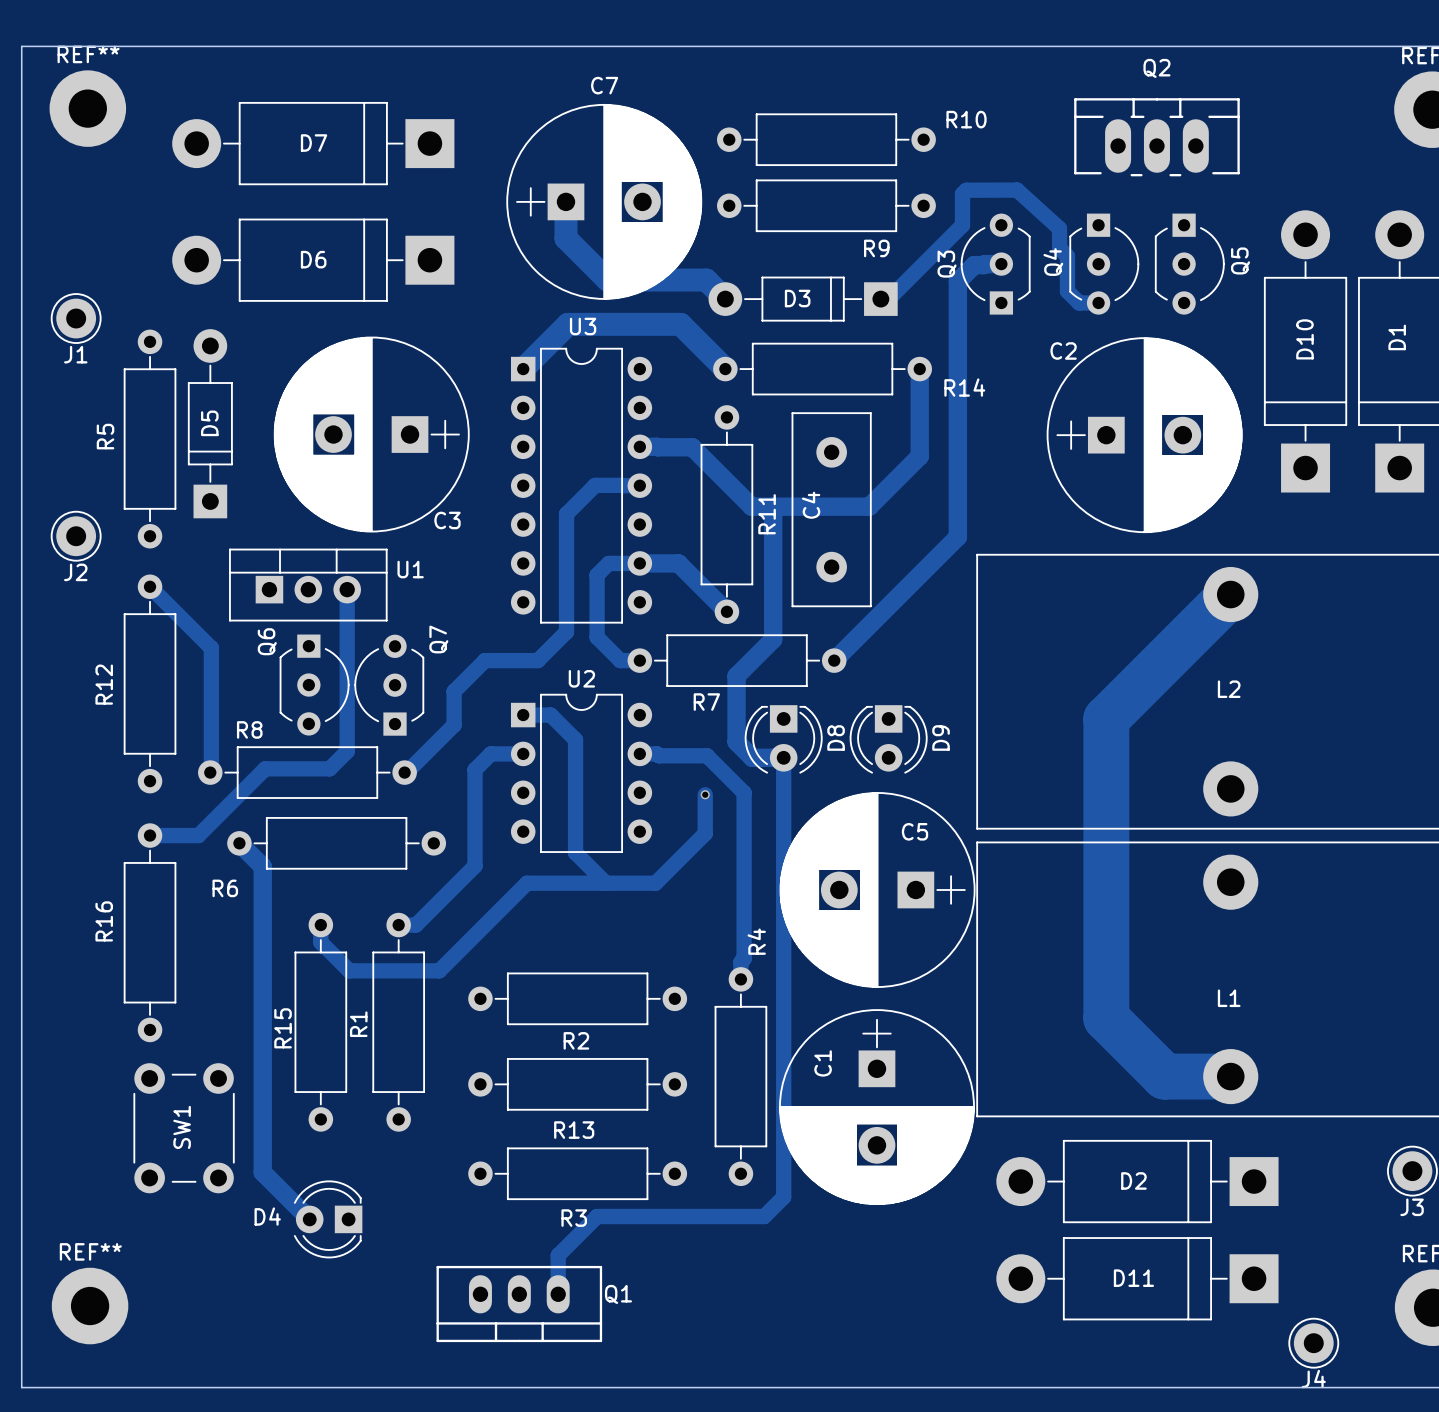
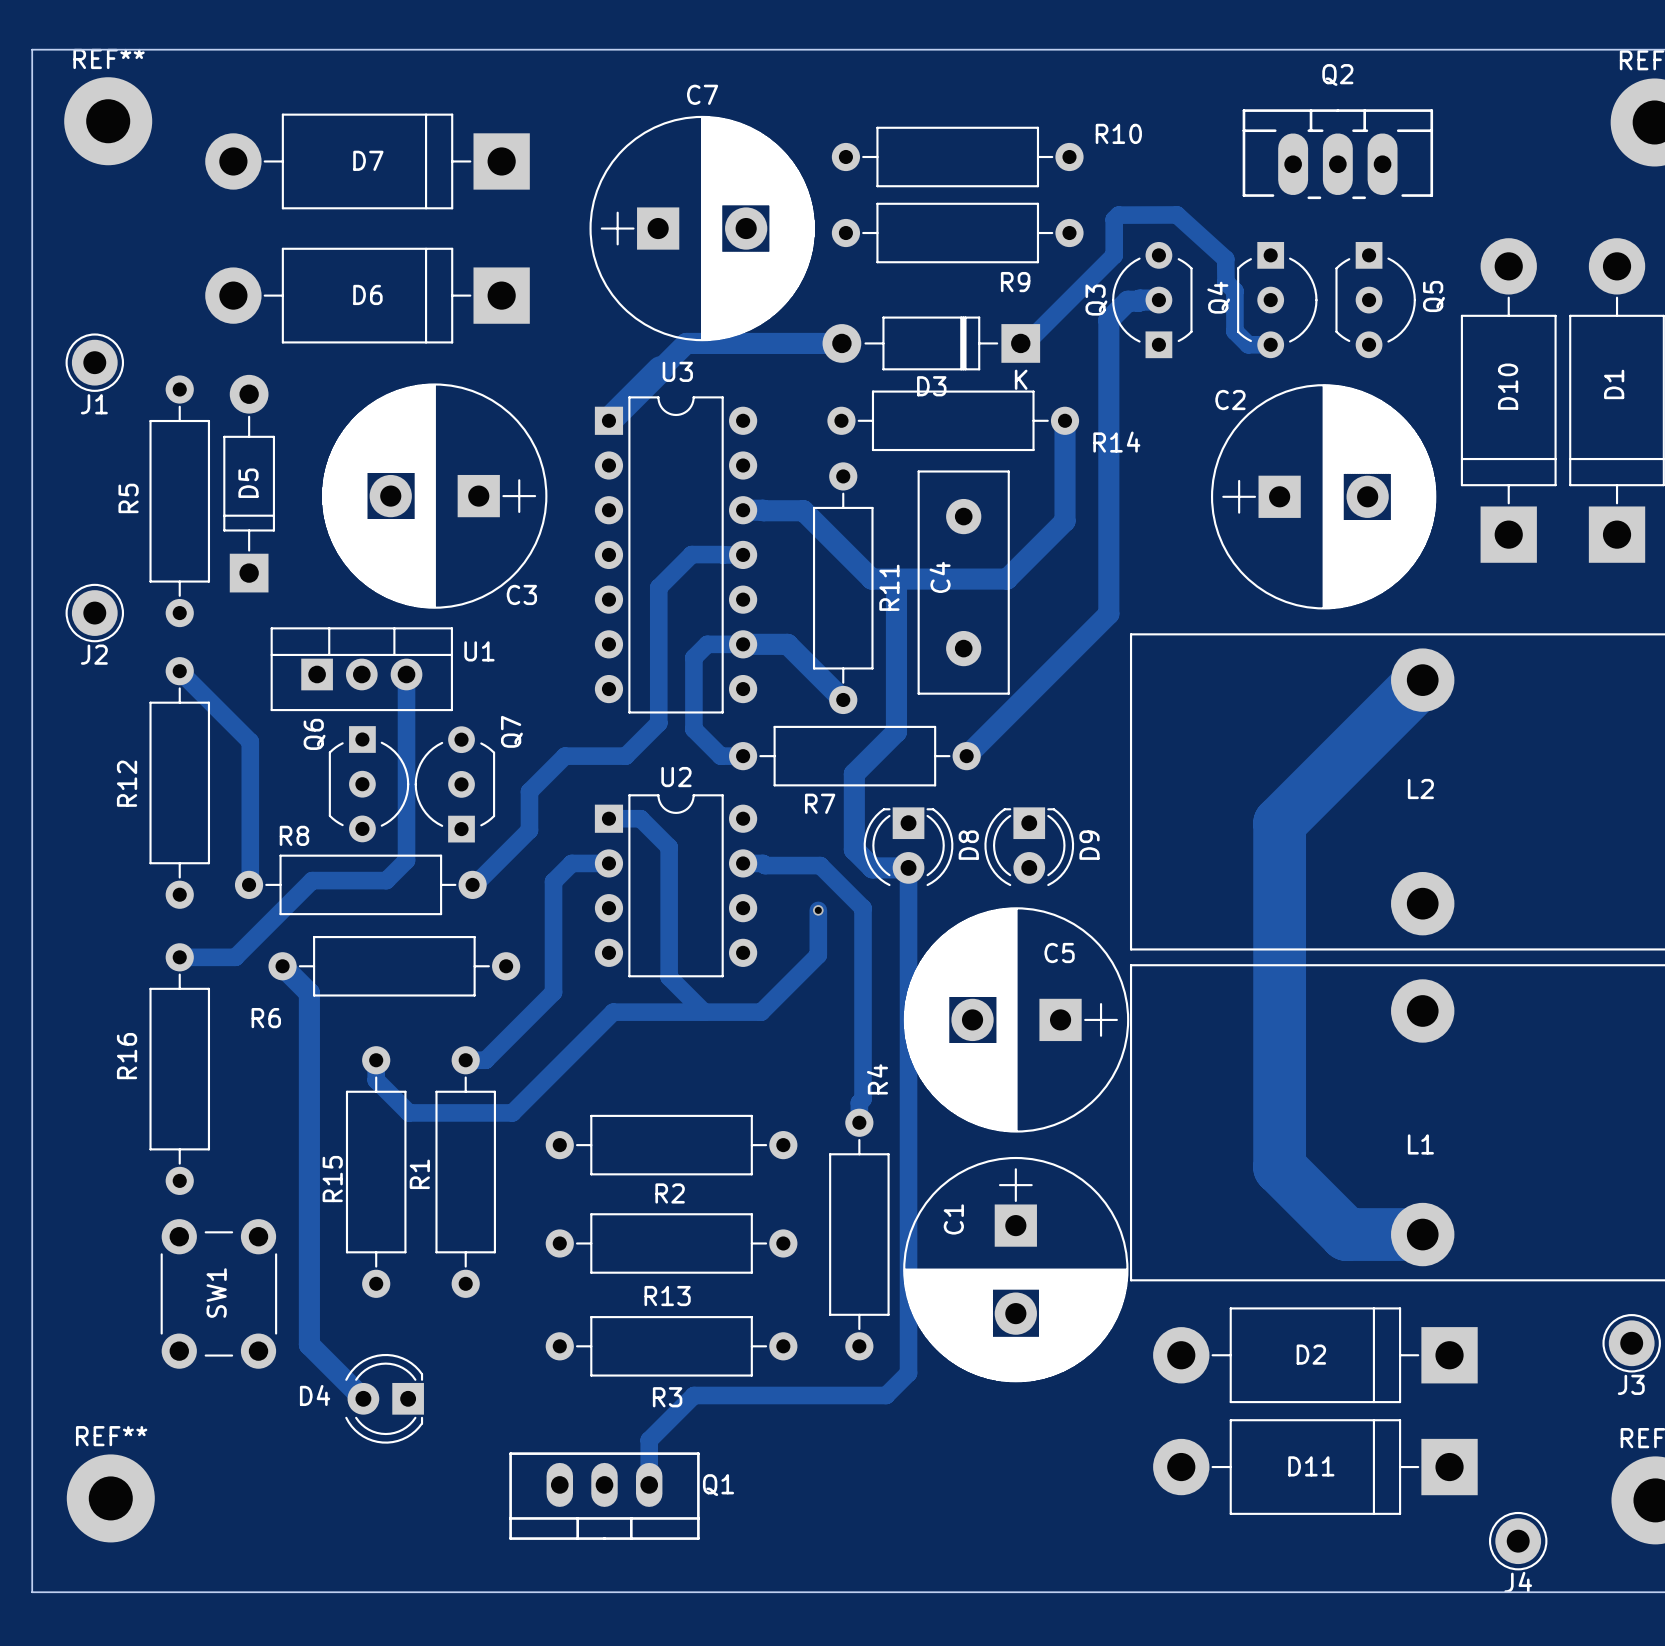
track: (565, 201) (565, 238) (607, 280) (706, 280) (725, 299) -> none
D3 footprint: [708, 276, 898, 322] -> [822, 316, 1041, 371]
D3 name position: D3 (797, 298) -> D3 (931, 386)
track: (567, 324) (680, 324) (725, 369) -> (660, 369) (686, 343) (841, 343)

